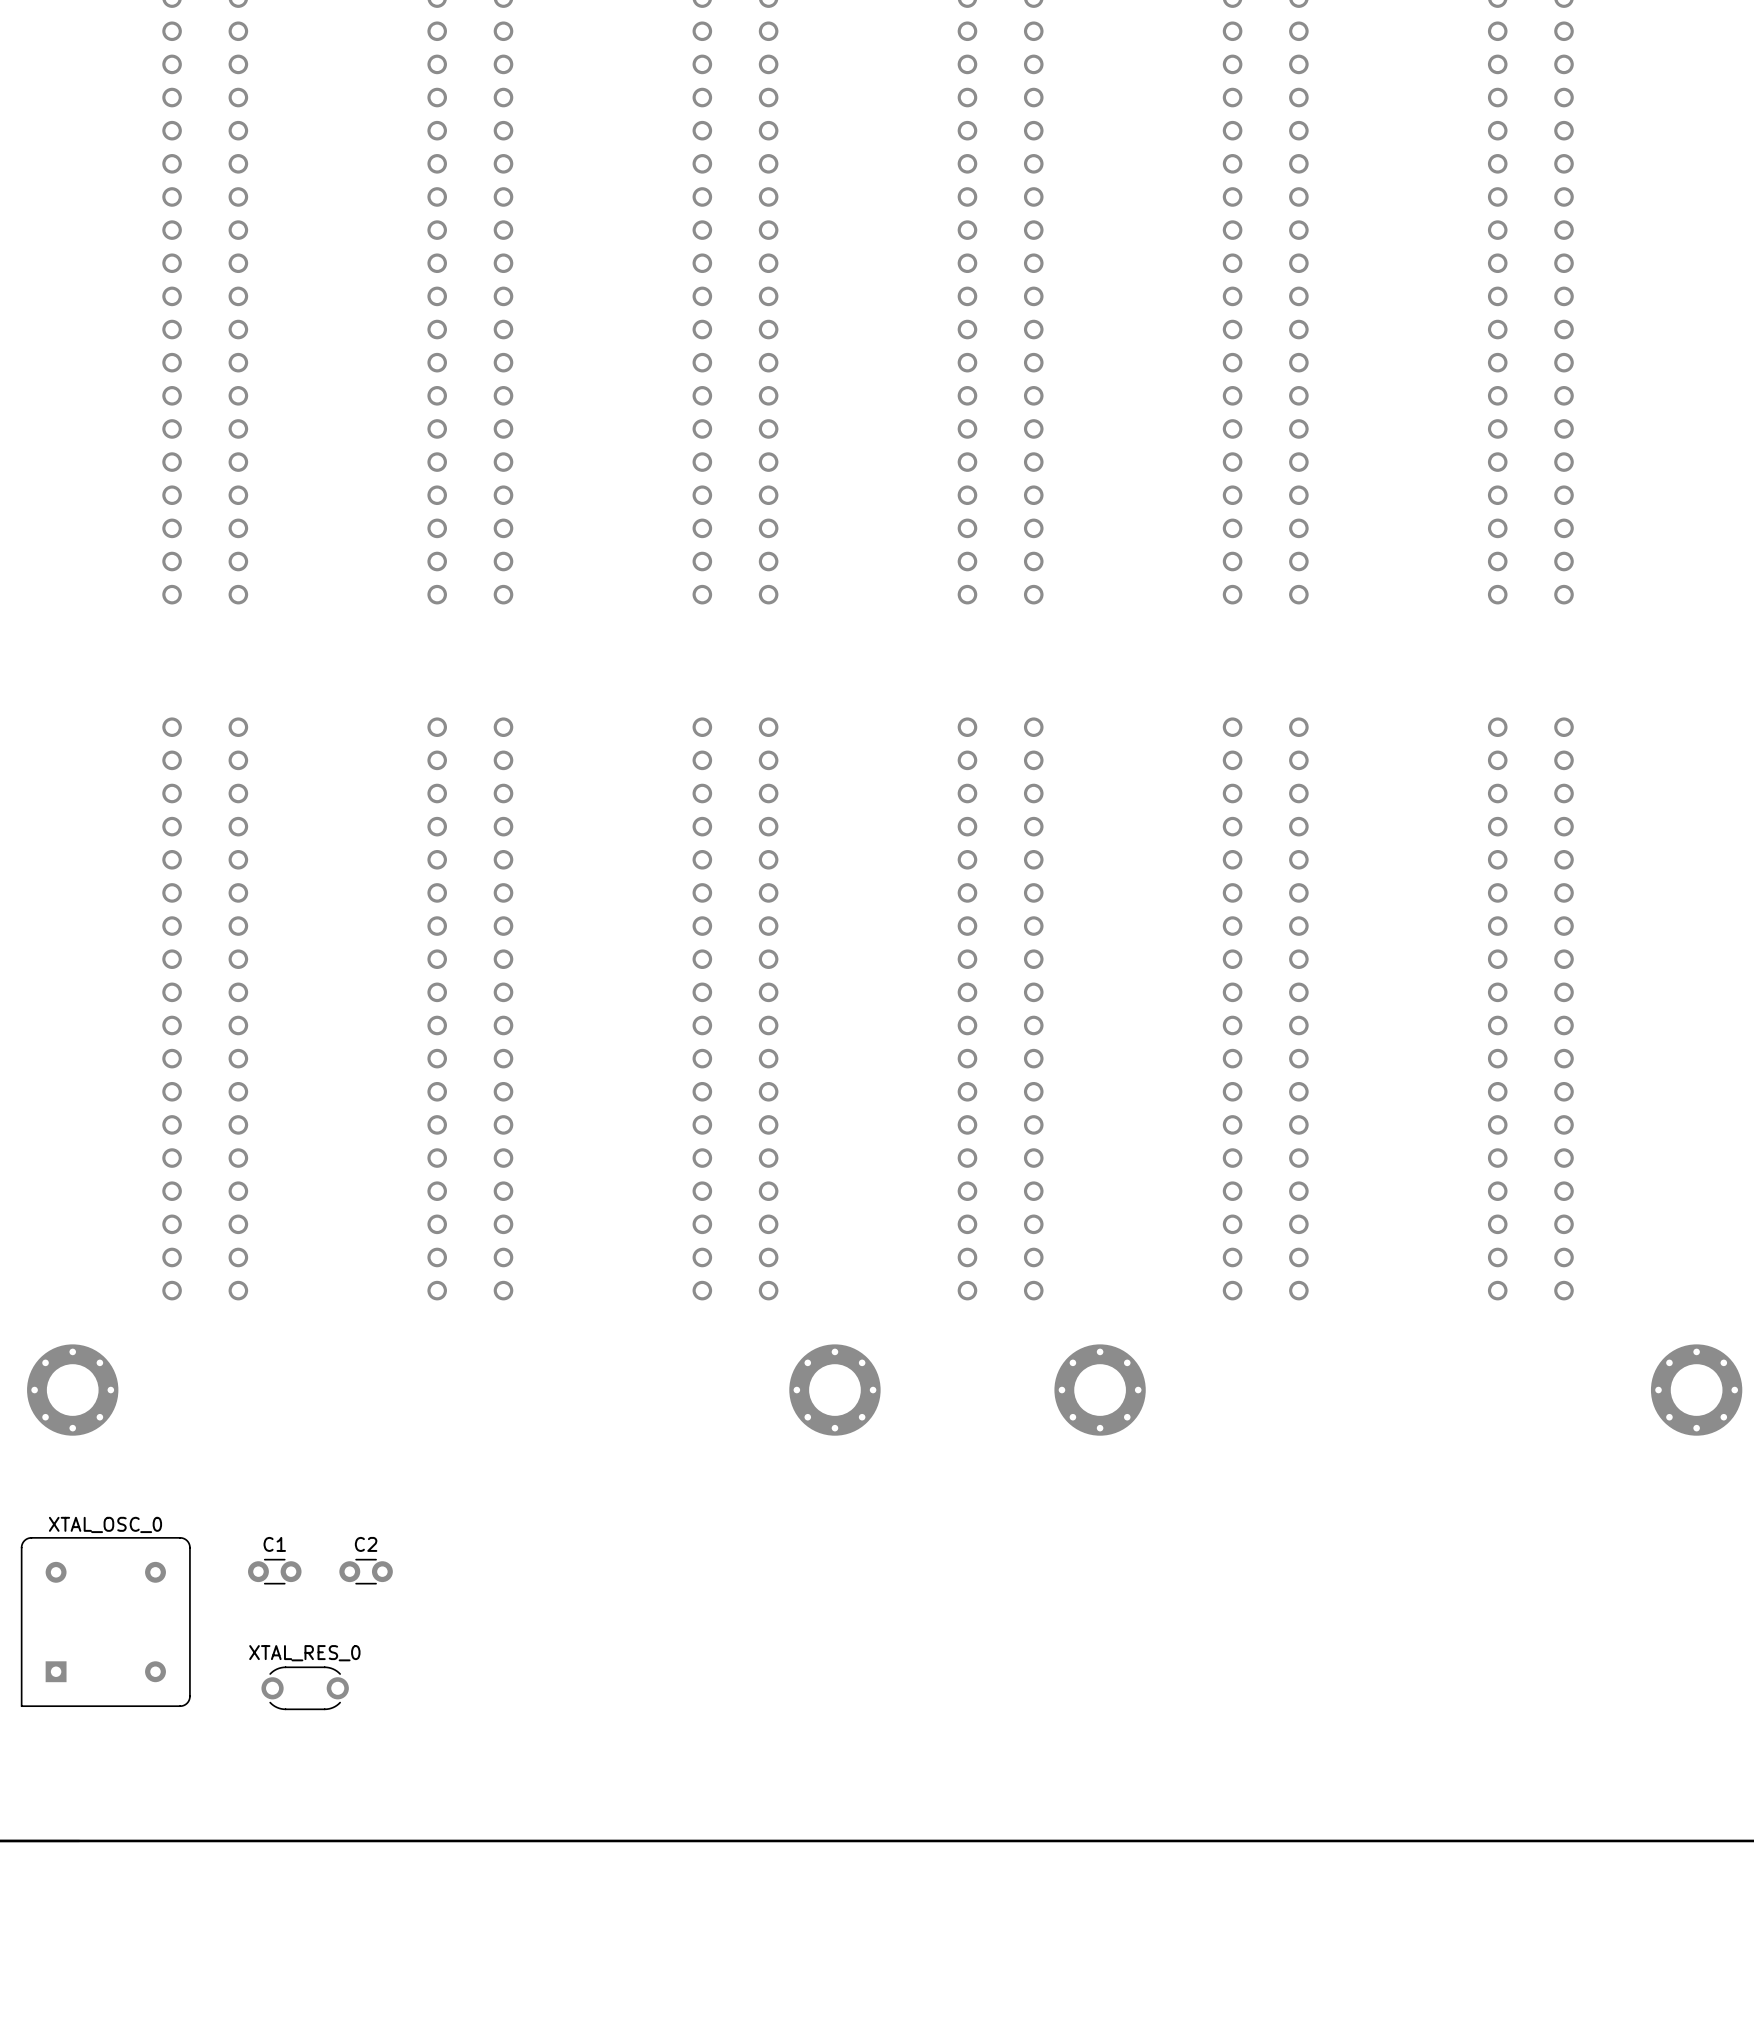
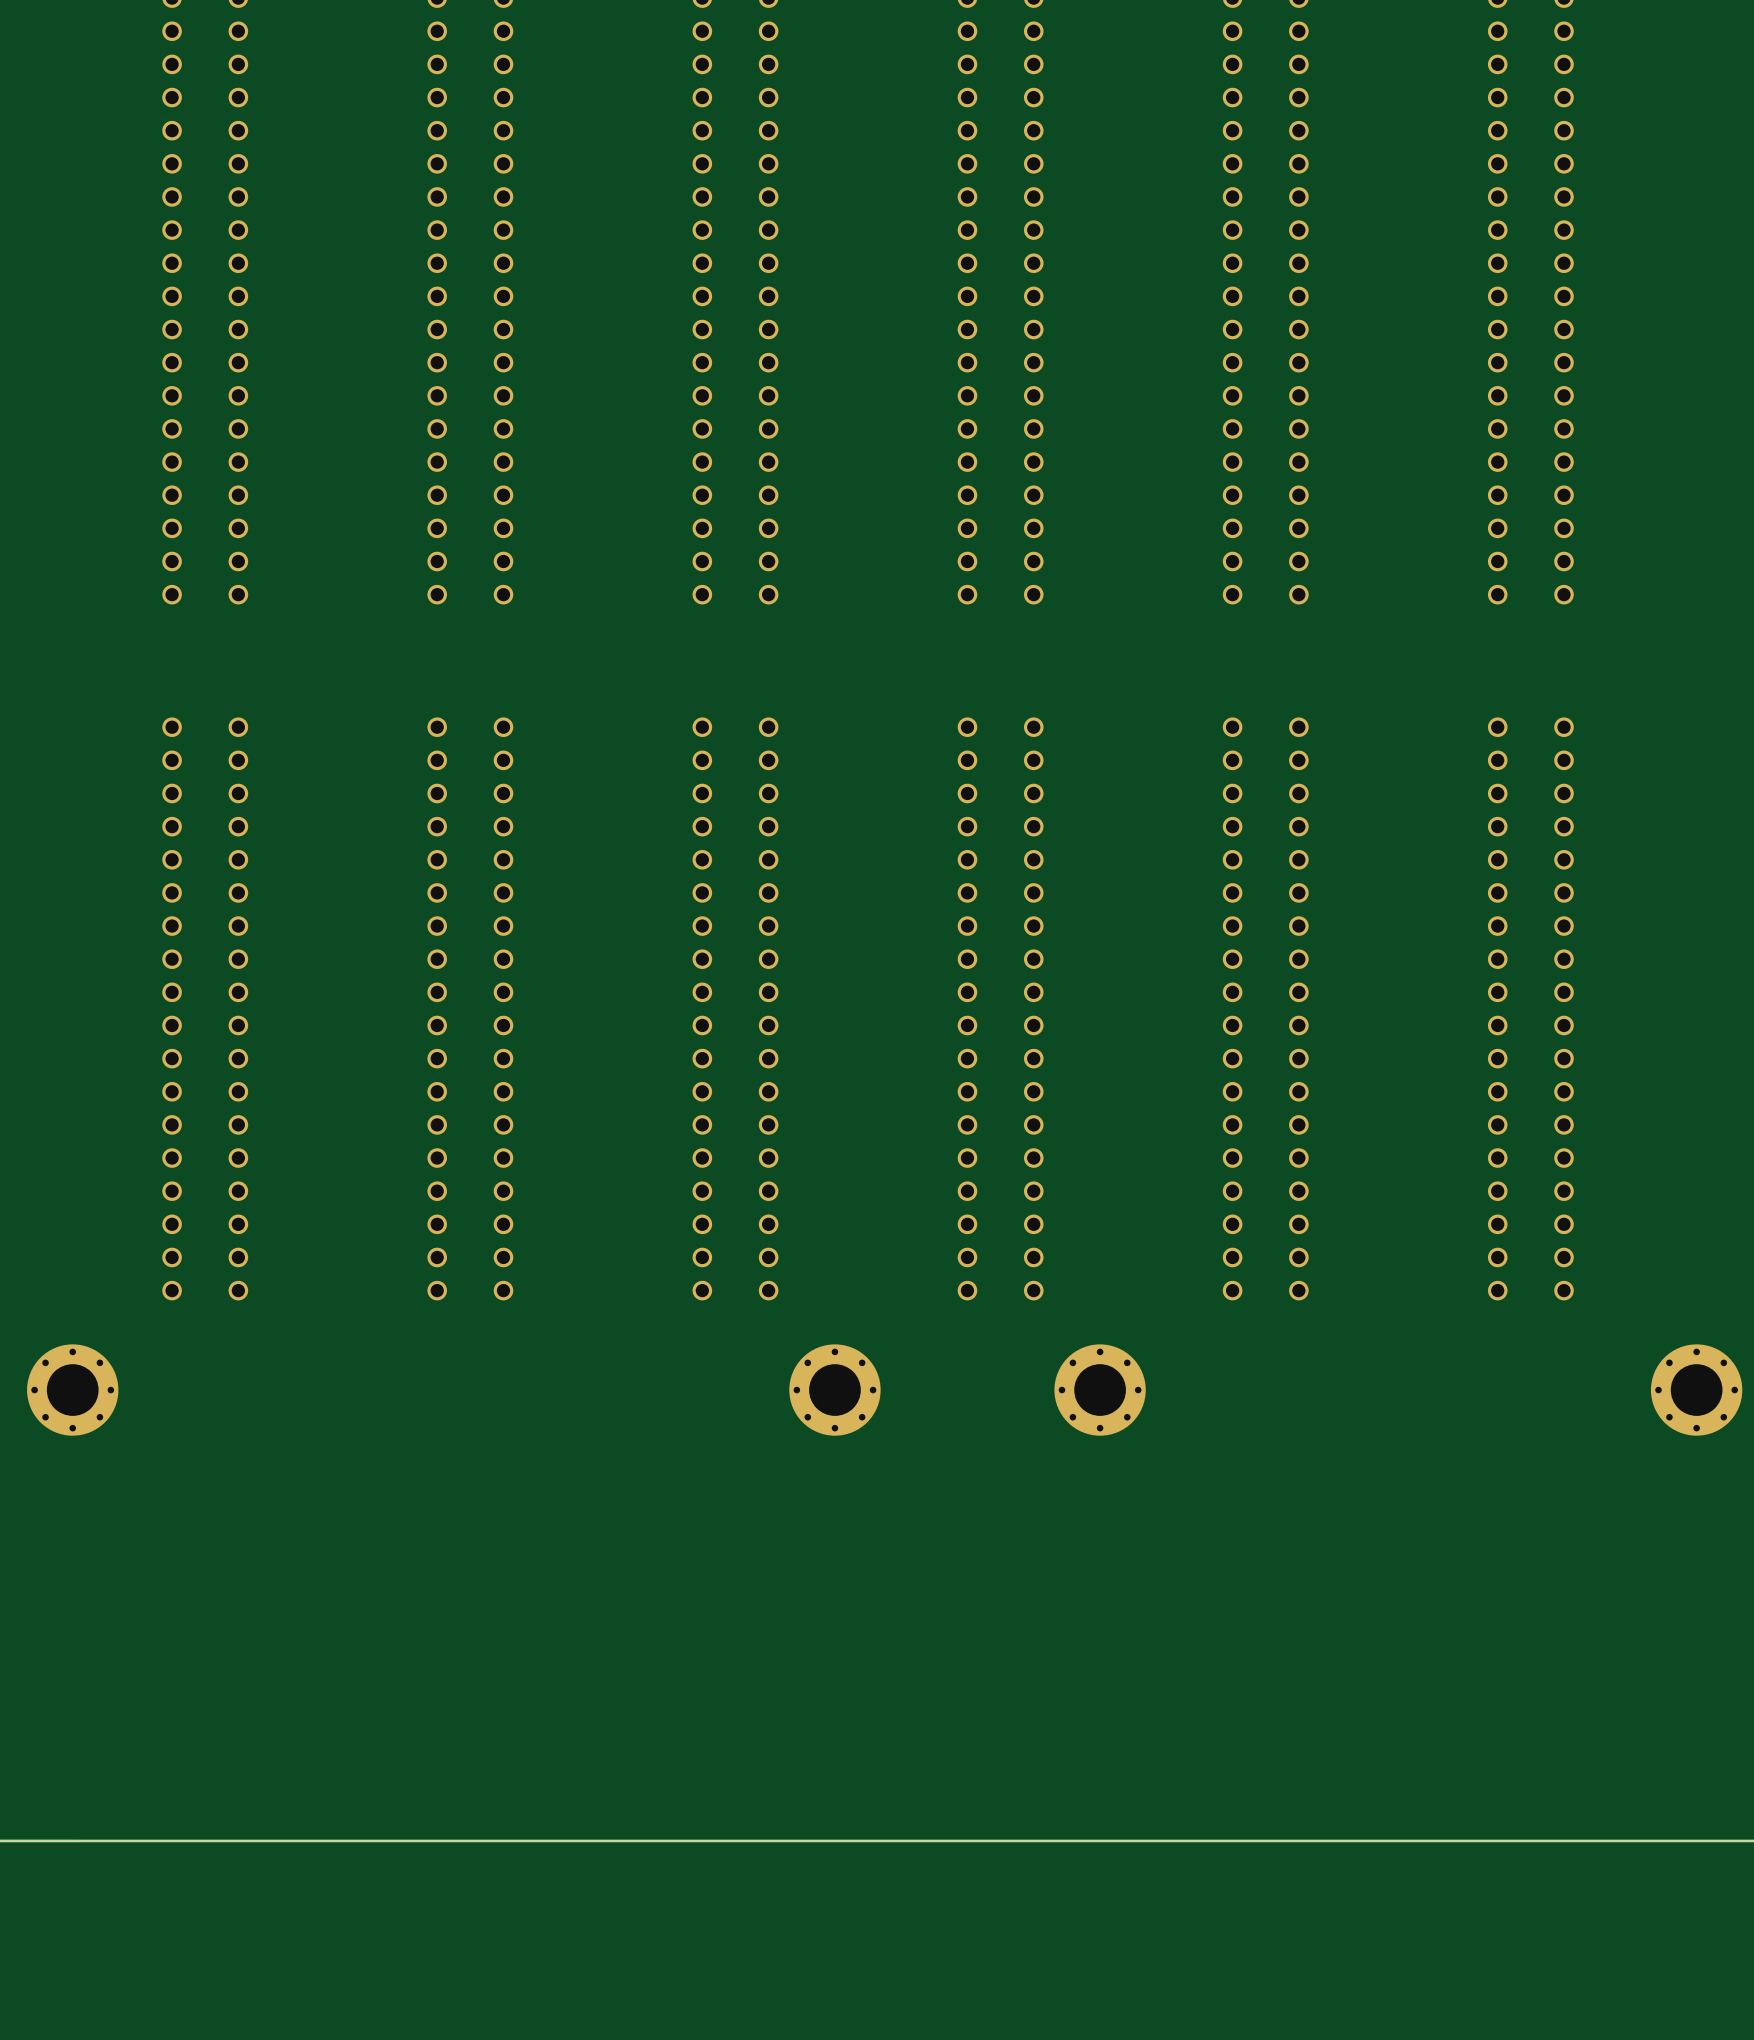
C1: (274, 1571) -> none
C2: (366, 1571) -> none
XTAL_OSC_0: (105, 1622) -> none
XTAL_RES_0: (305, 1688) -> none

